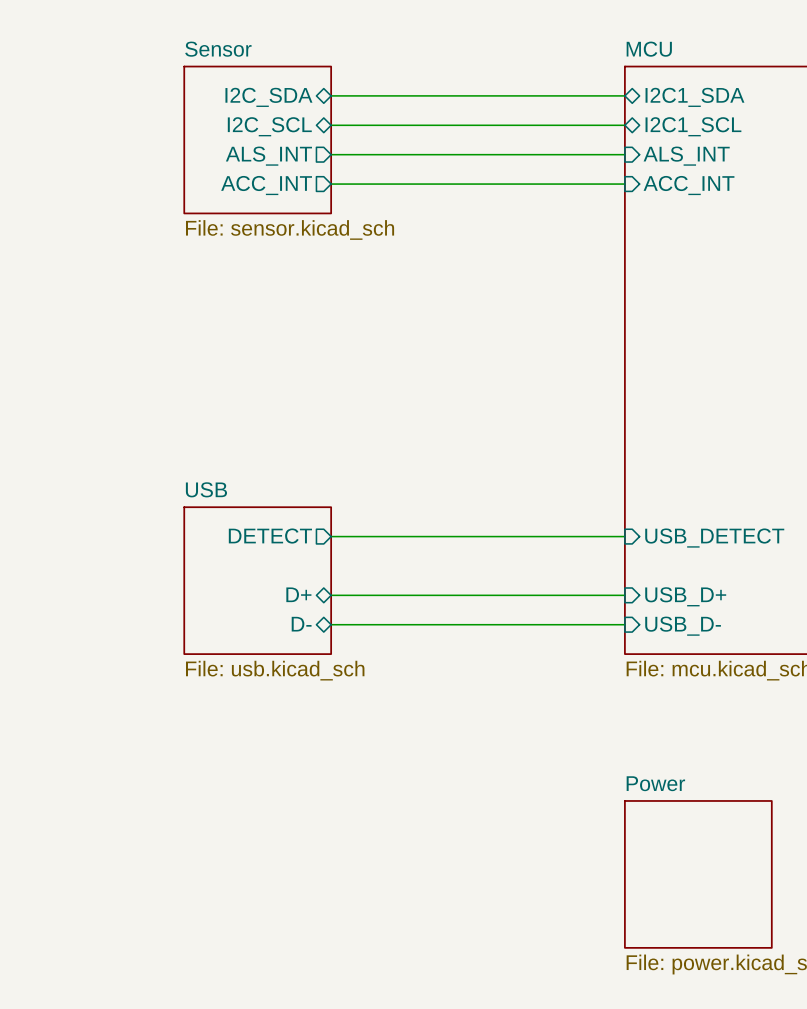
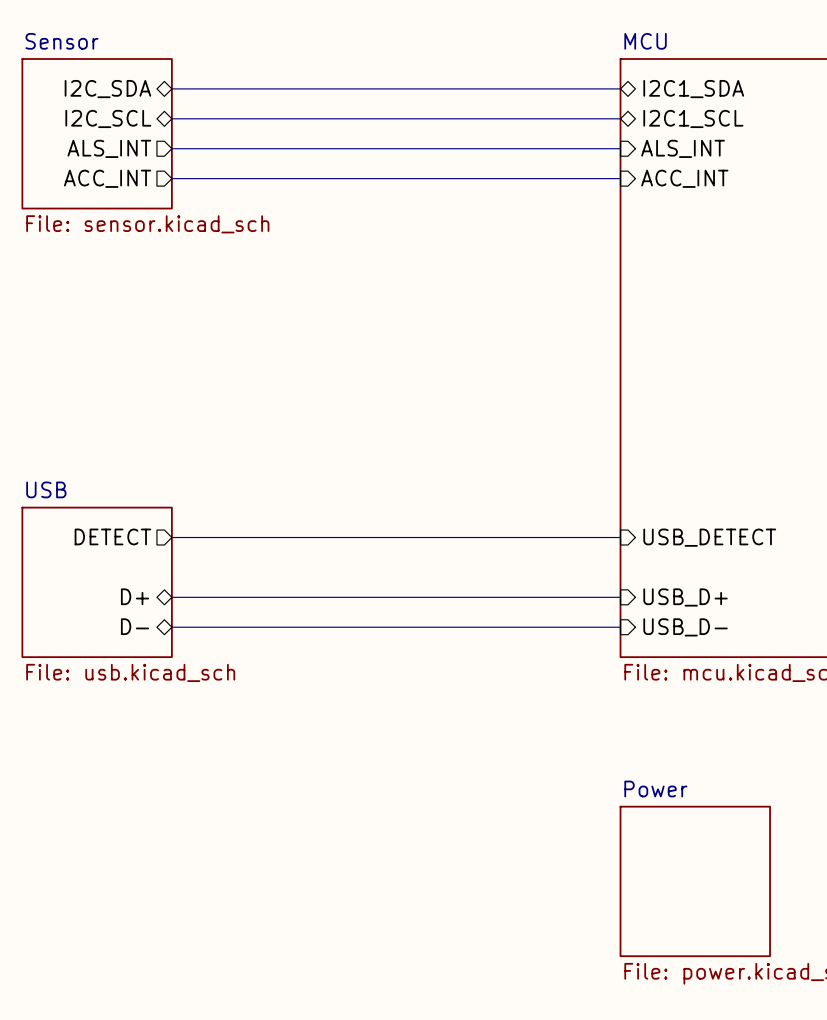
wire: none -> (171, 88) (321, 88)
sheet pin position: I2C_SDA (268, 97) -> I2C_SDA (107, 89)
wire: none -> (171, 118) (321, 118)
sheet pin position: I2C_SCL (269, 126) -> I2C_SCL (108, 118)
sheet Sensor position: (257, 139) -> (97, 133)
wire: none -> (171, 148) (321, 148)
sheet pin position: ALS_INT (268, 156) -> ALS_INT (109, 148)
wire: none -> (171, 178) (321, 178)
sheet pin position: ACC_INT (266, 185) -> ACC_INT (107, 178)
wire: none -> (171, 537) (321, 537)
sheet pin position: DETECT (270, 536) -> DETECT (112, 536)
sheet USB position: (257, 580) -> (97, 582)
sheet pin position: D+ (298, 594) -> D+ (135, 596)
wire: none -> (171, 597) (321, 597)
wire: none -> (171, 627) (321, 627)
sheet pin position: D- (301, 624) -> D- (135, 626)

